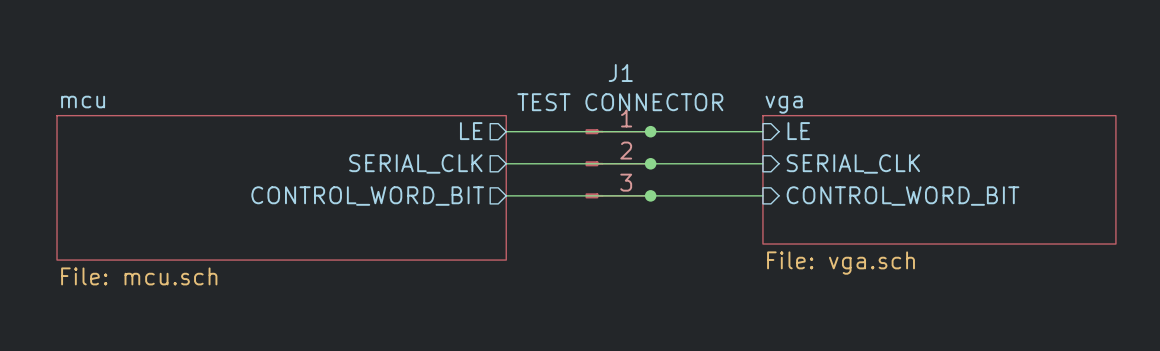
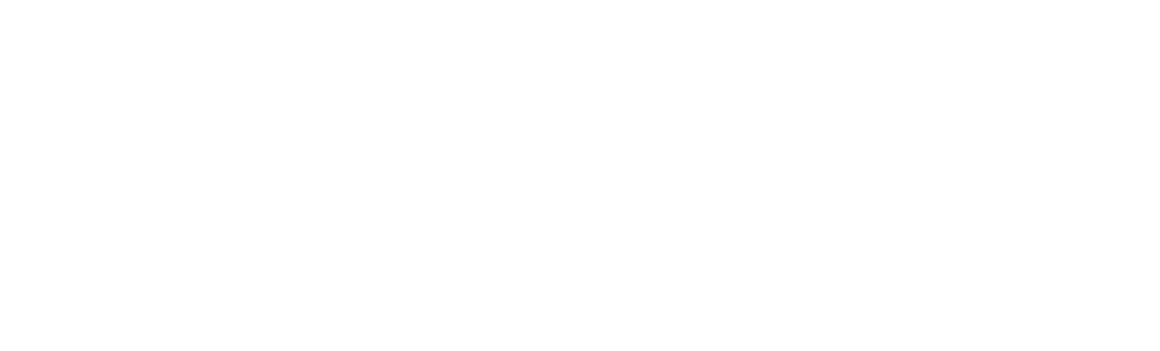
sheet pin: LE (471, 131) -> none
wire: (506, 131) (762, 131) -> none
junction: (650, 131) -> none
sheet pin: LE (798, 131) -> none
sheet pin: SERIAL_CLK (415, 163) -> none
wire: (506, 163) (762, 163) -> none
J1: TEST CONNECTOR (618, 163) -> none
junction: (650, 163) -> none
sheet pin: SERIAL_CLK (853, 163) -> none
sheet vga: File: vga.sch (939, 179) -> none
sheet mcu: File: mcu.sch (281, 187) -> none
wire: (506, 195) (762, 195) -> none
junction: (650, 195) -> none
sheet pin: CONTROL_WORD_BIT (367, 196) -> none
sheet pin: CONTROL_WORD_BIT (903, 196) -> none

